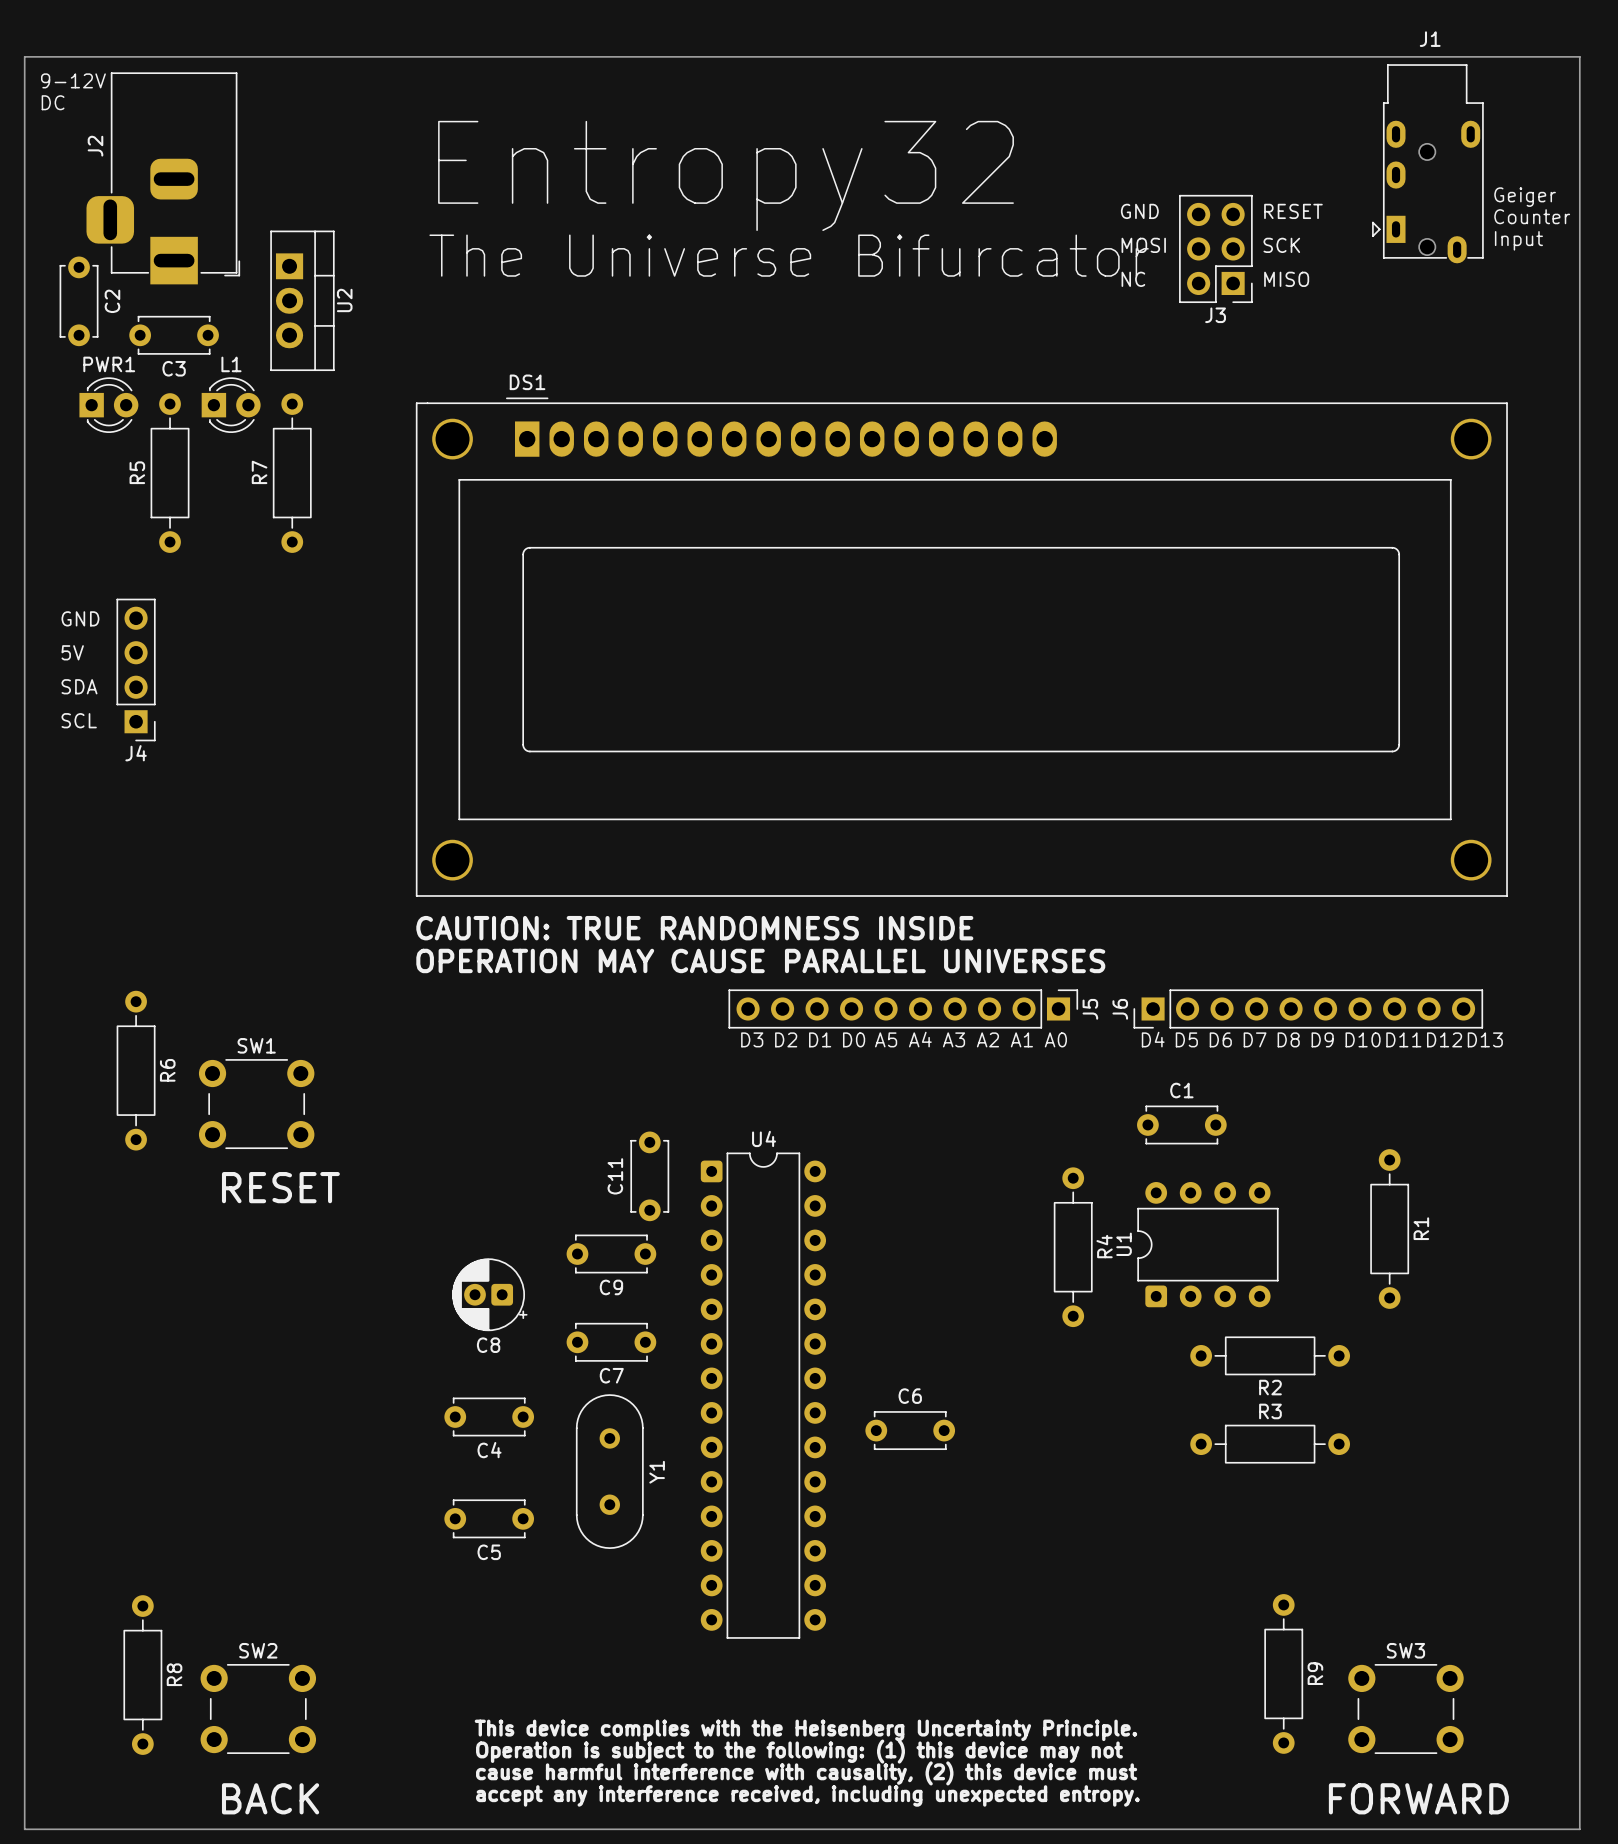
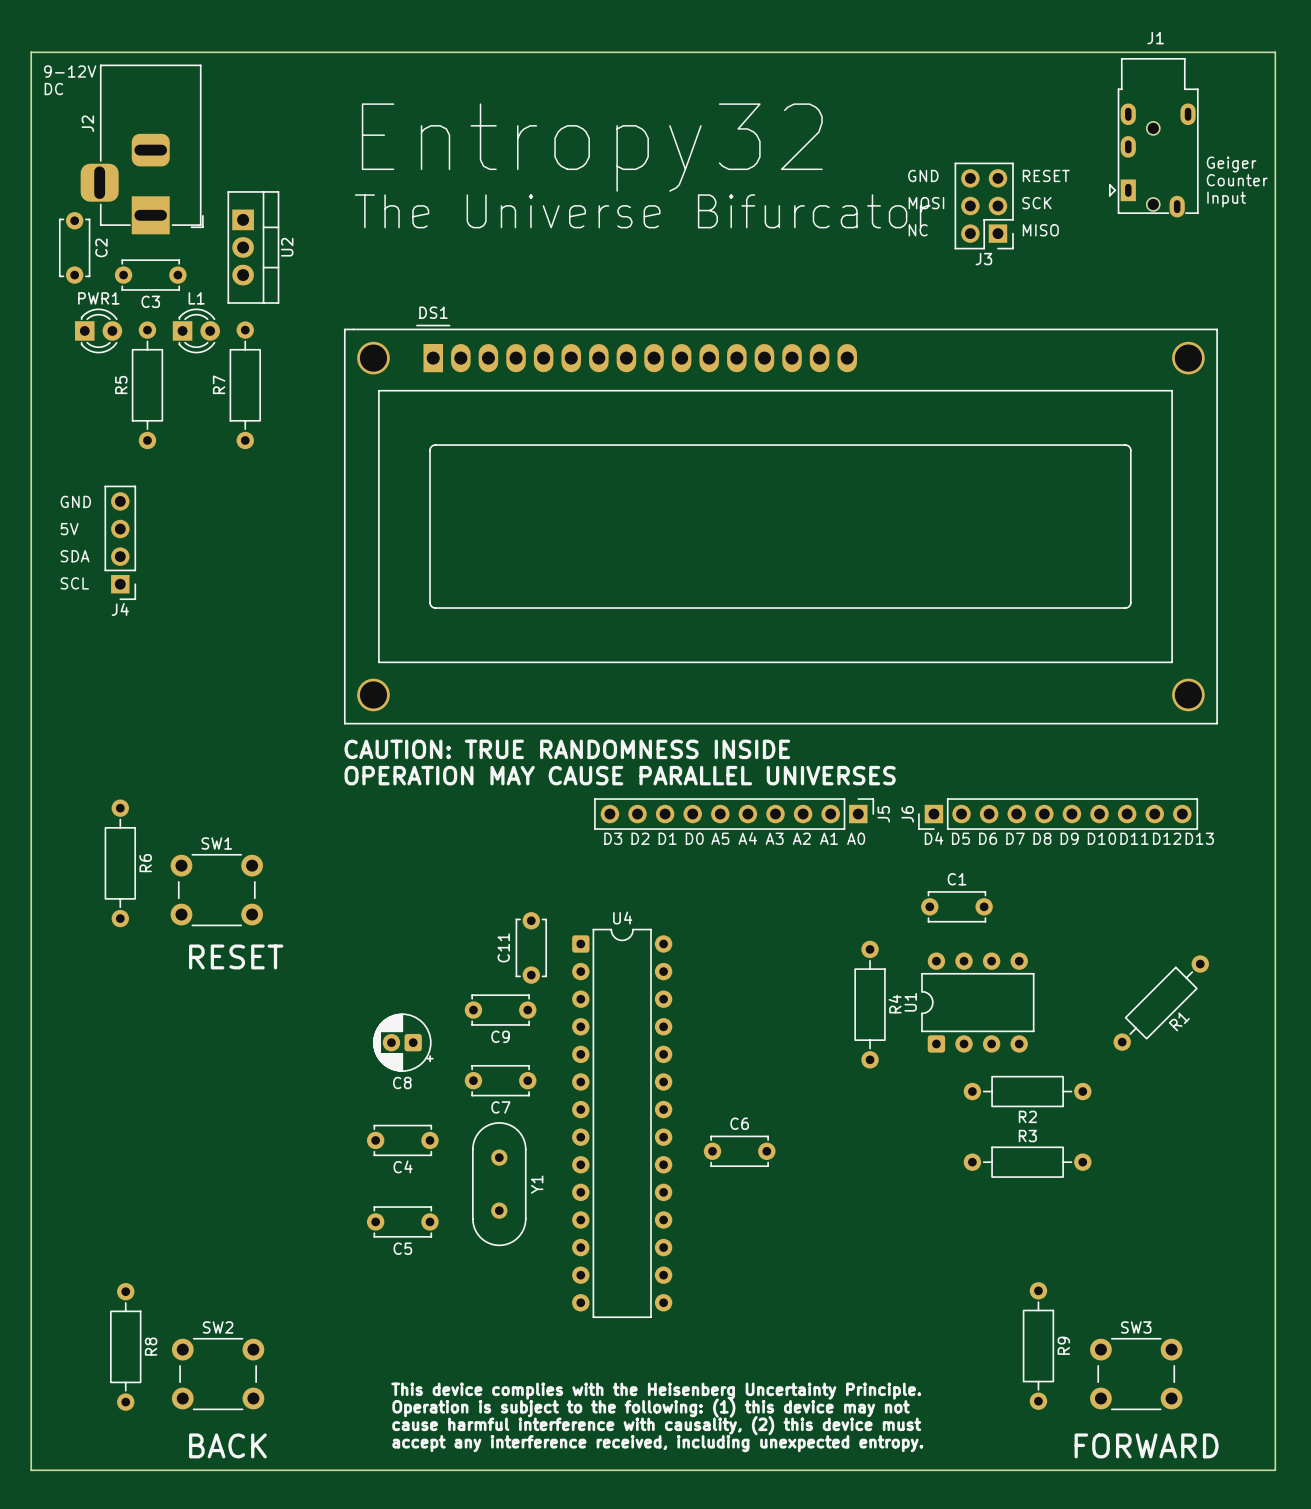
R1 rotation: 0° (1389, 1229) -> 45° clockwise (1161, 1003)

